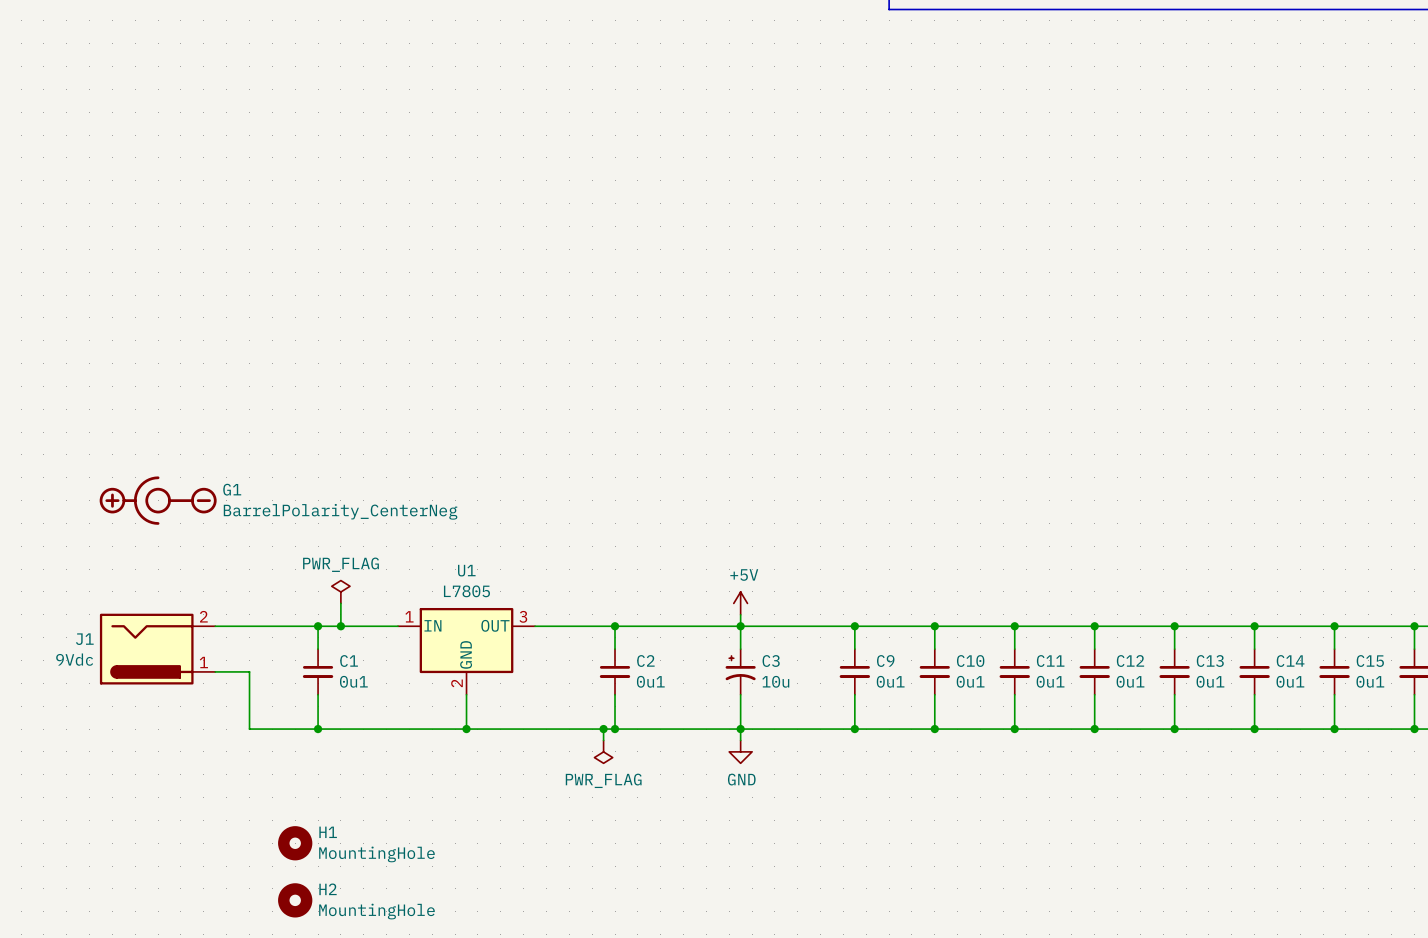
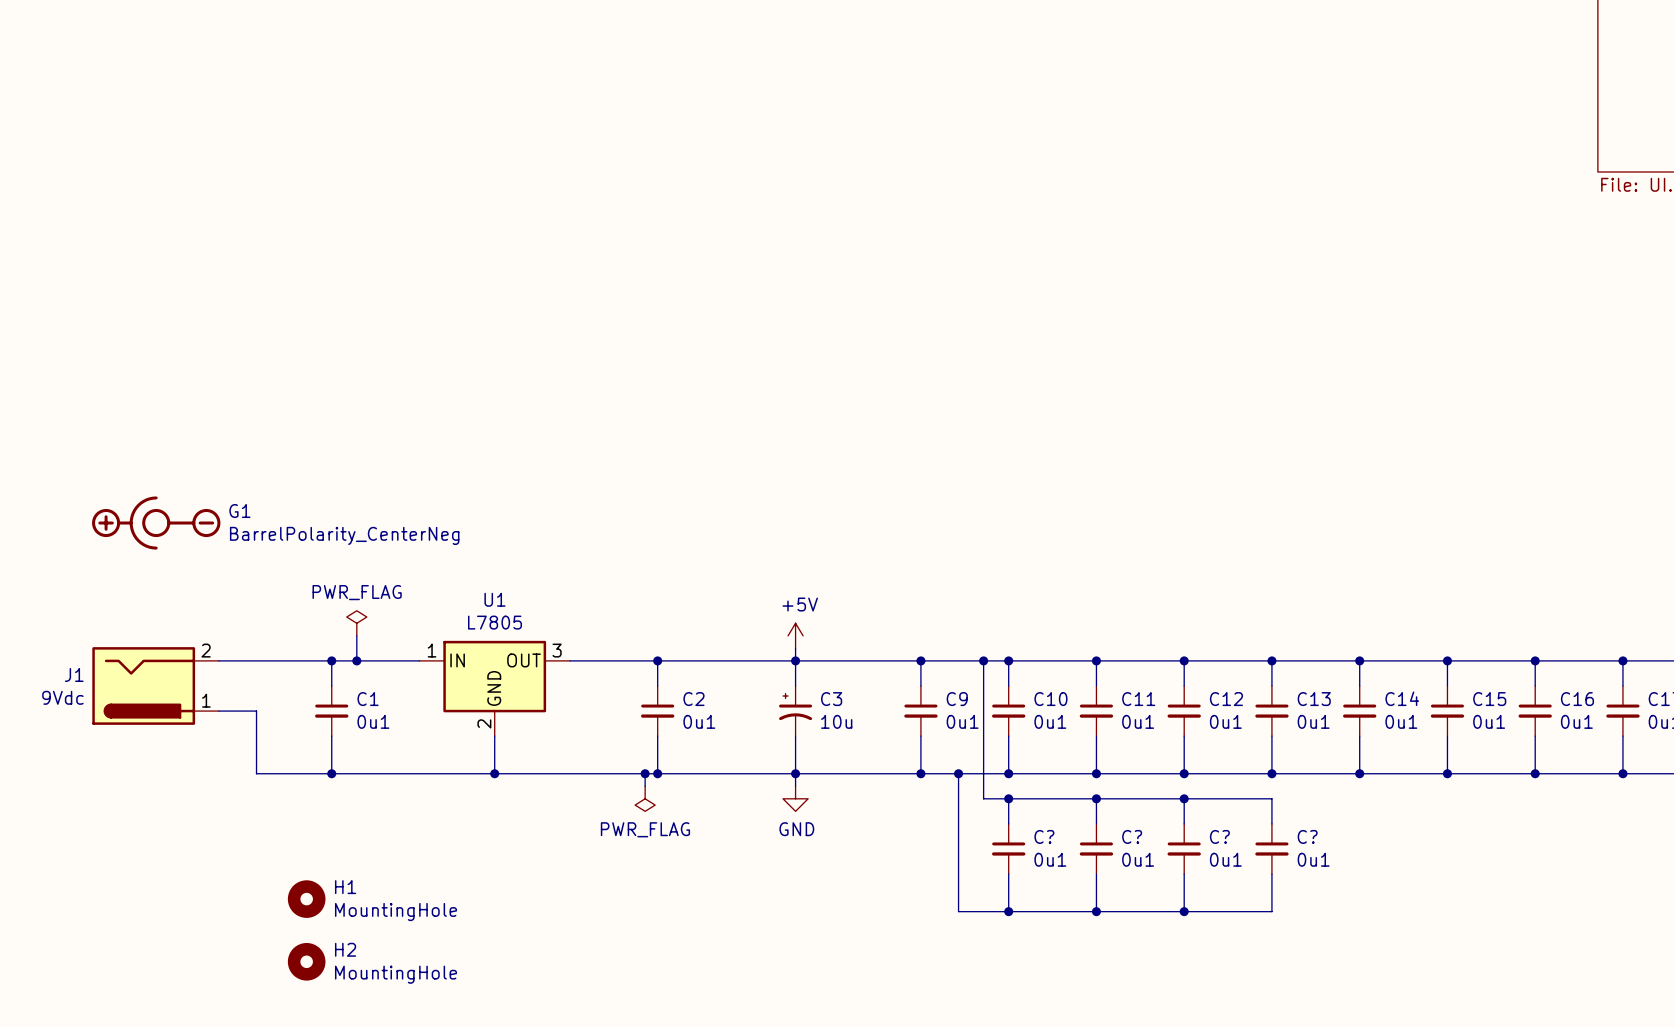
wire: none -> (983, 660) (983, 798) (1271, 798) (1271, 823)
junction: none -> (983, 660)
wire: none -> (958, 773) (958, 911) (1271, 911) (1271, 874)
junction: none -> (958, 773)
wire: none -> (1008, 798) (1008, 823)
junction: none -> (1008, 798)
wire: none -> (1096, 798) (1096, 823)
junction: none -> (1096, 798)
wire: none -> (1184, 798) (1184, 823)
junction: none -> (1184, 798)
C?: none -> 0u1 (1008, 848)
C?: none -> 0u1 (1096, 848)
C?: none -> 0u1 (1184, 848)
C?: none -> 0u1 (1271, 848)
wire: none -> (1008, 874) (1008, 911)
wire: none -> (1096, 874) (1096, 911)
wire: none -> (1184, 874) (1184, 911)
junction: none -> (1008, 911)
junction: none -> (1096, 911)
junction: none -> (1184, 911)

